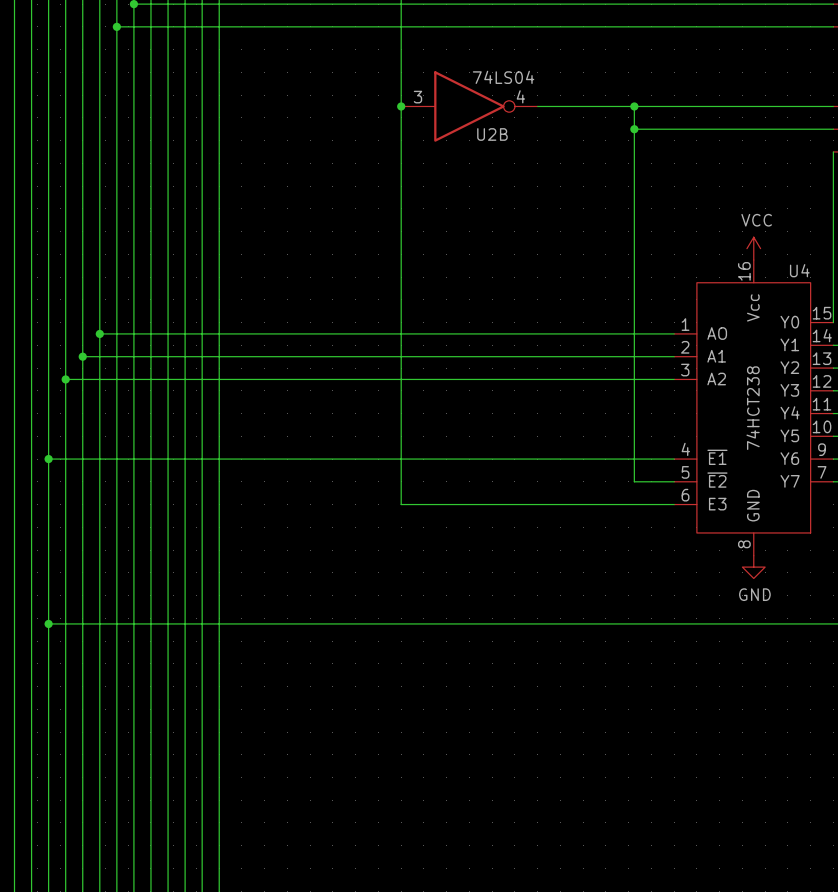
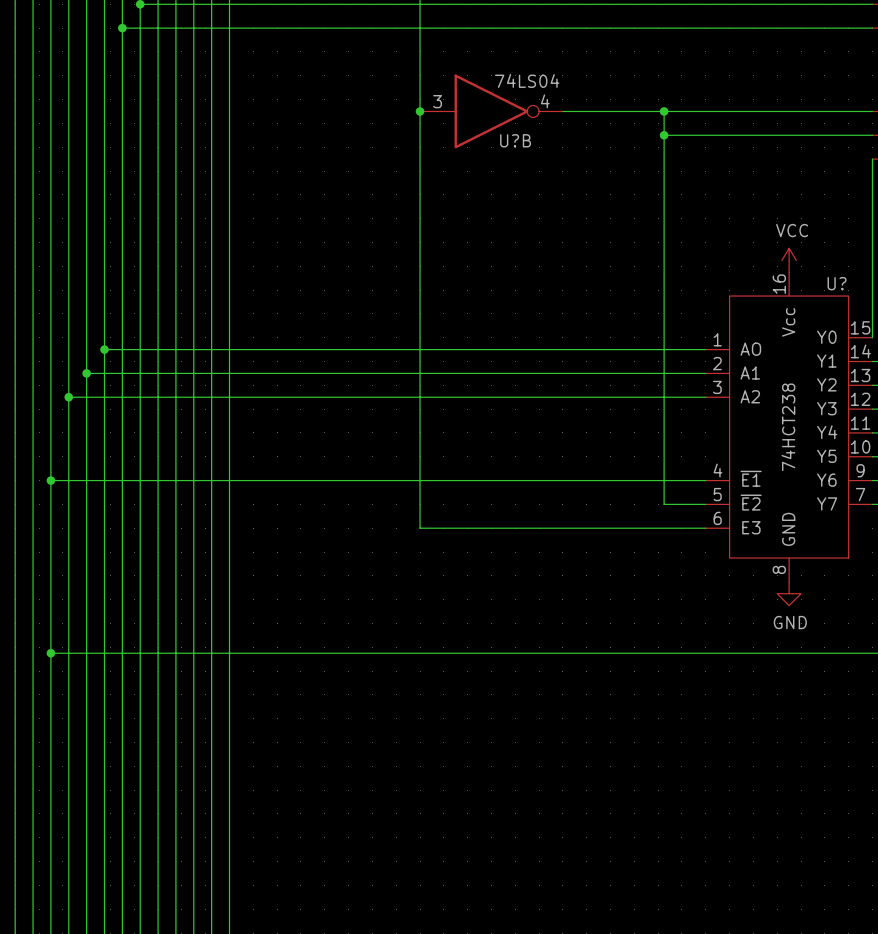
U2B name: U2B (492, 134) -> U?B (515, 140)
U4 name: U4 (799, 270) -> U? (837, 283)

